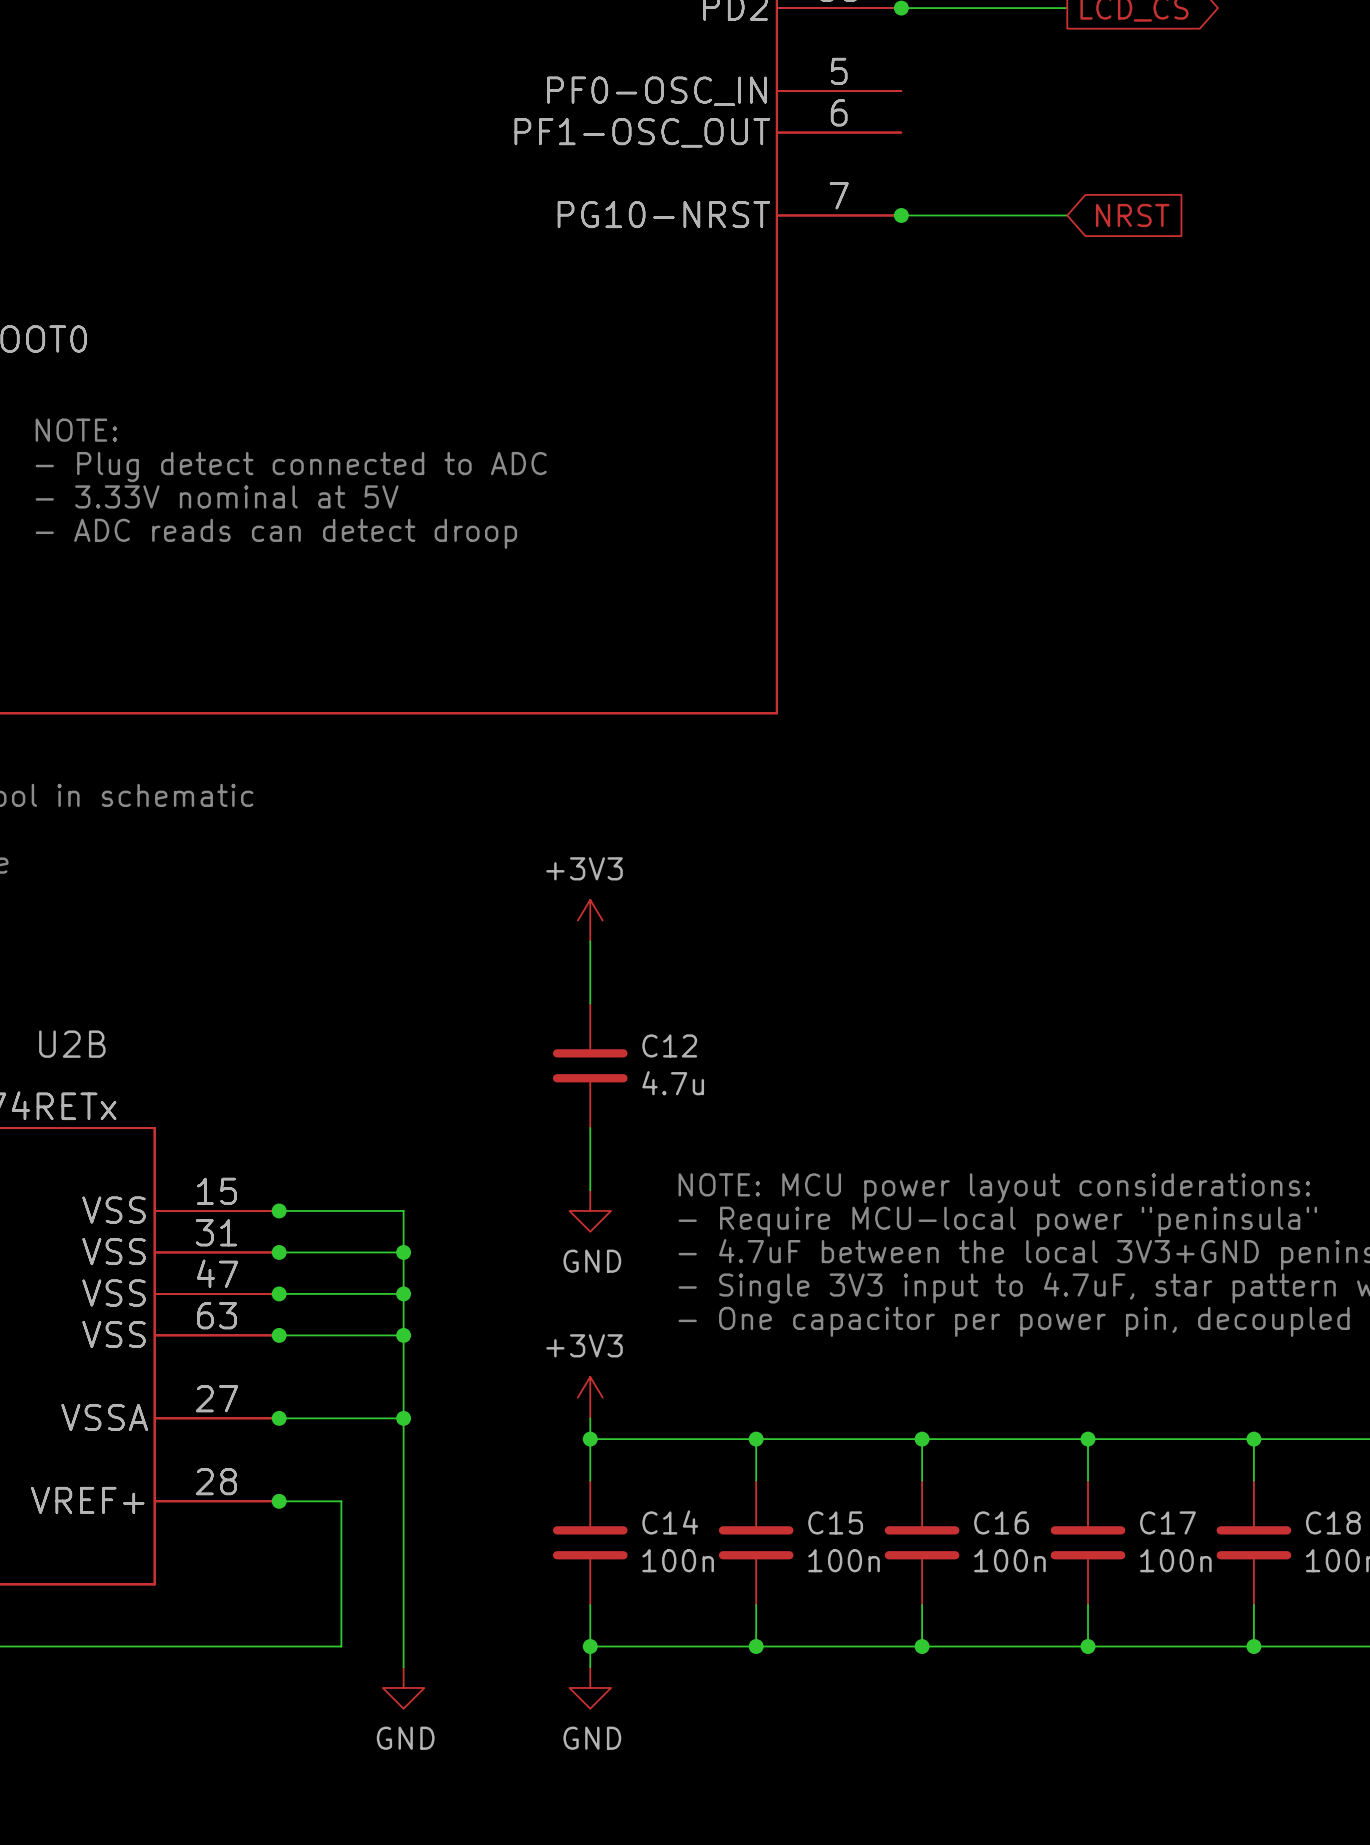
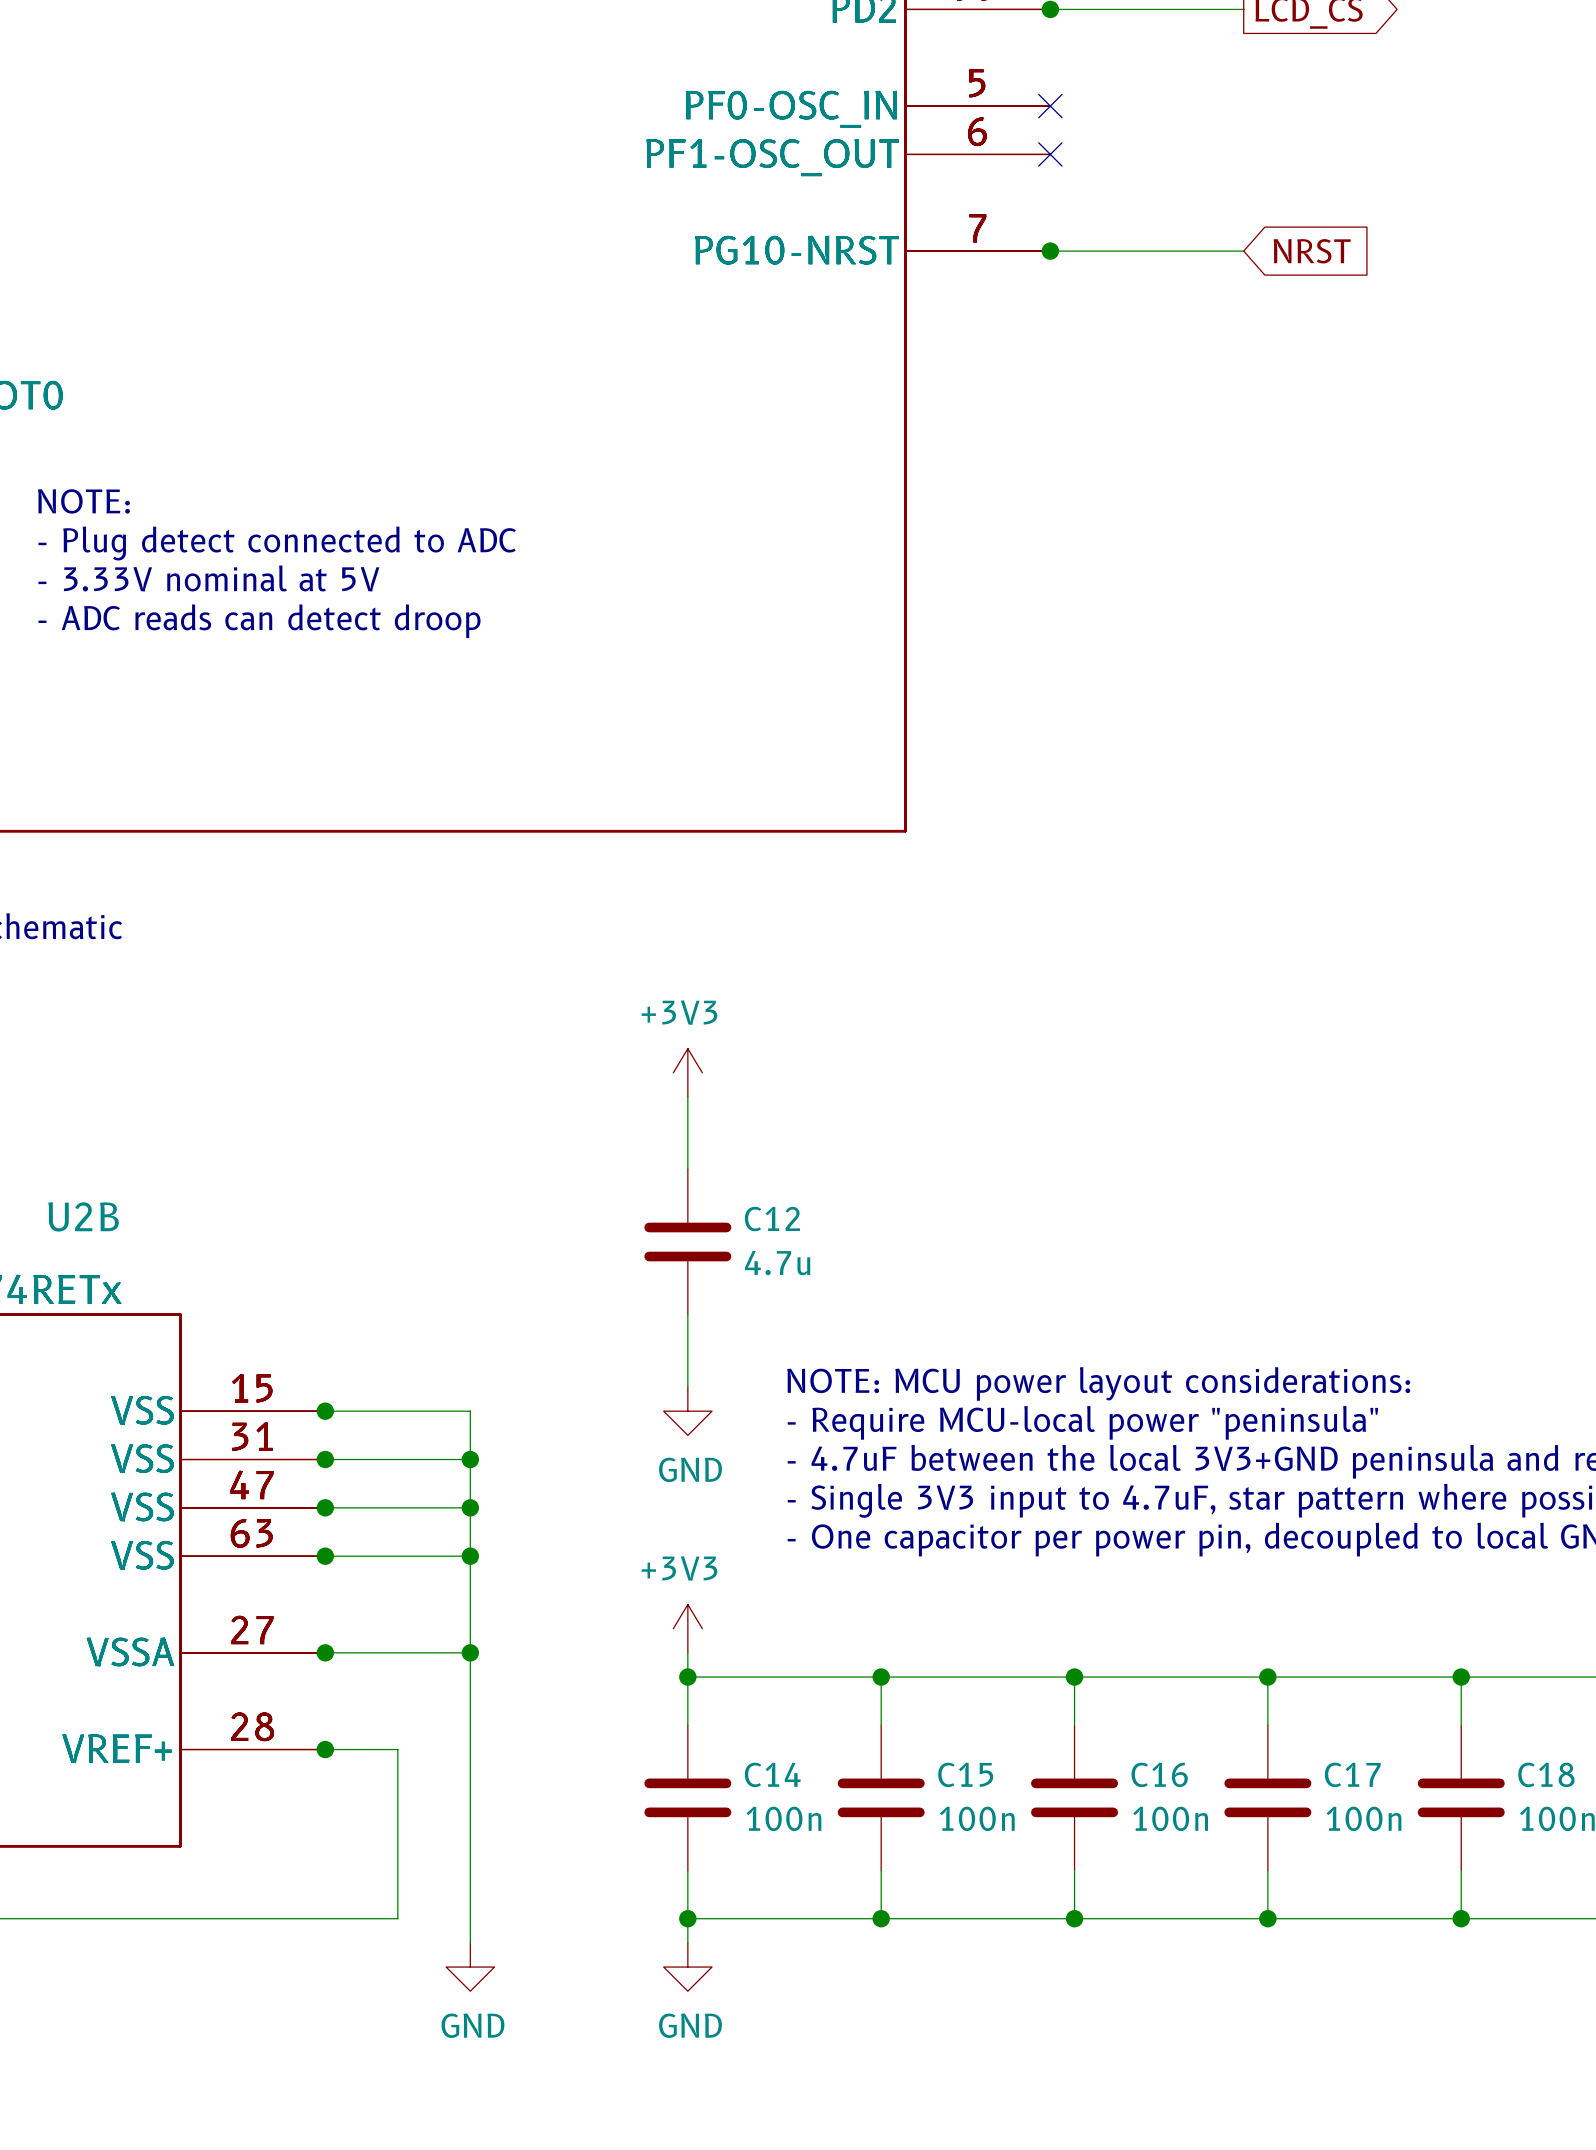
no-connect mark: none -> (1050, 106)
no-connect mark: none -> (1050, 154)

